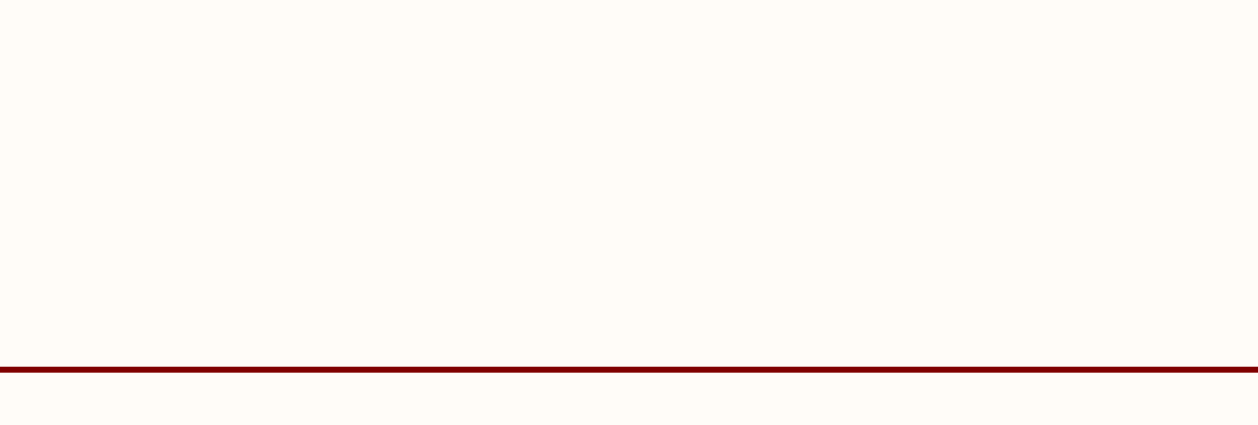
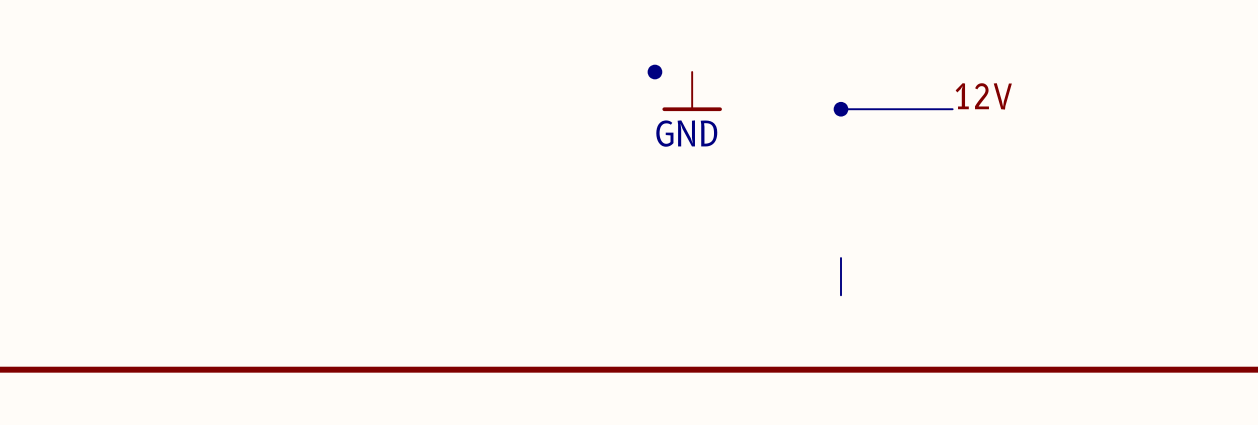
junction: none -> (654, 72)
power symbol: none -> GND (692, 91)
label: none -> 12V (983, 96)
wire: none -> (840, 109) (952, 109)
junction: none -> (840, 109)
wire: none -> (840, 258) (840, 295)

